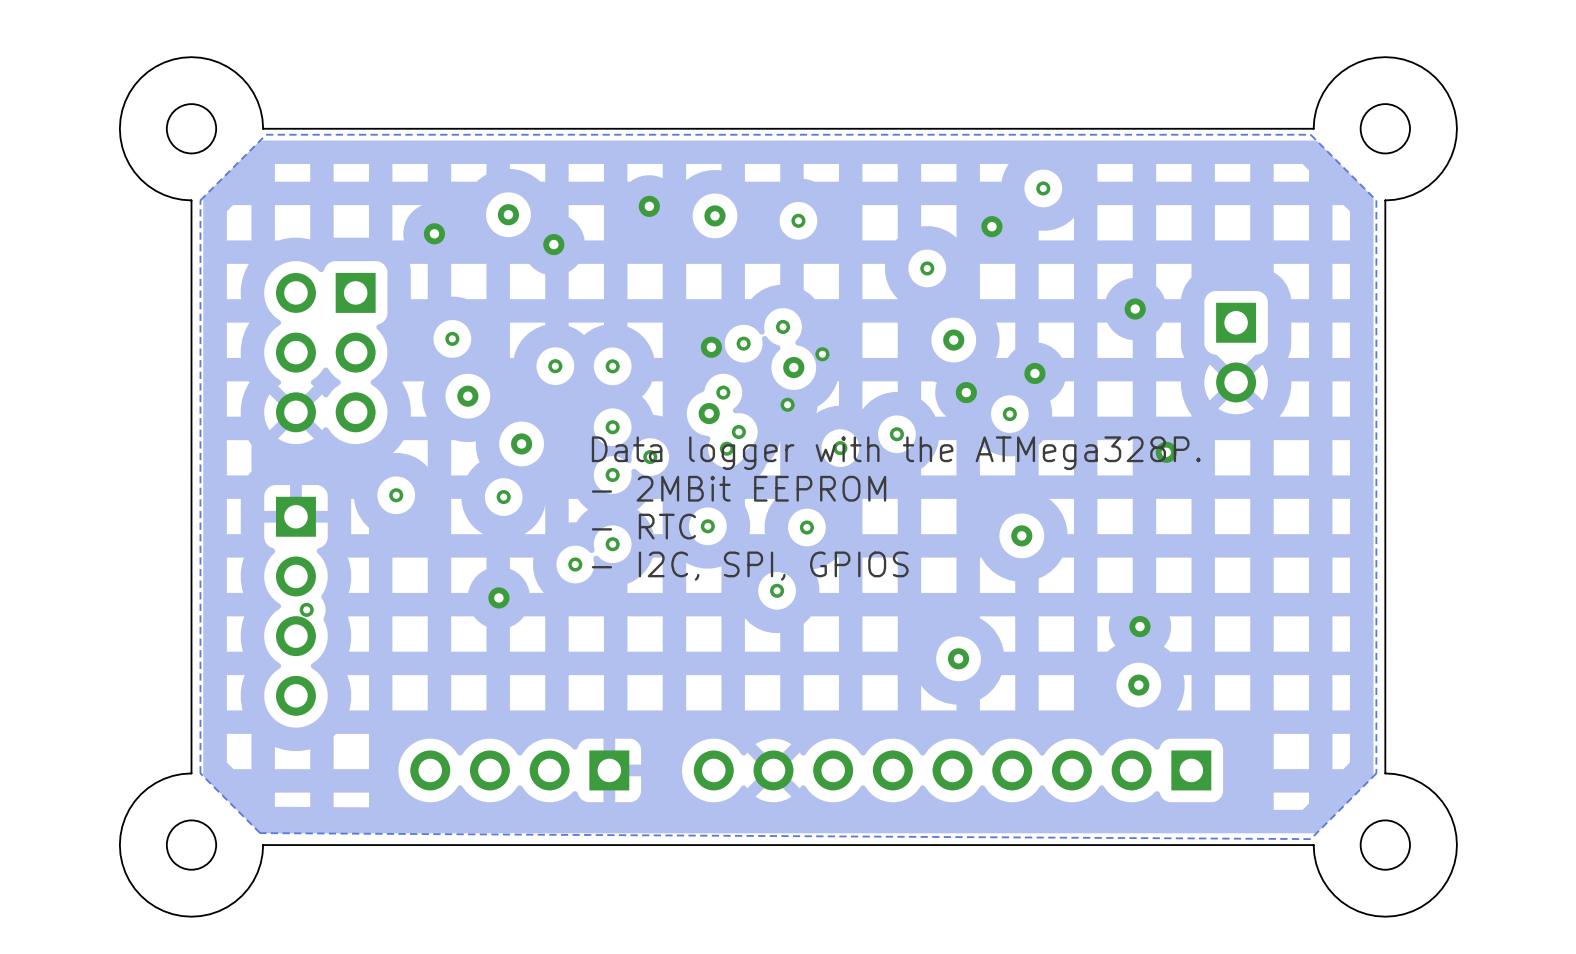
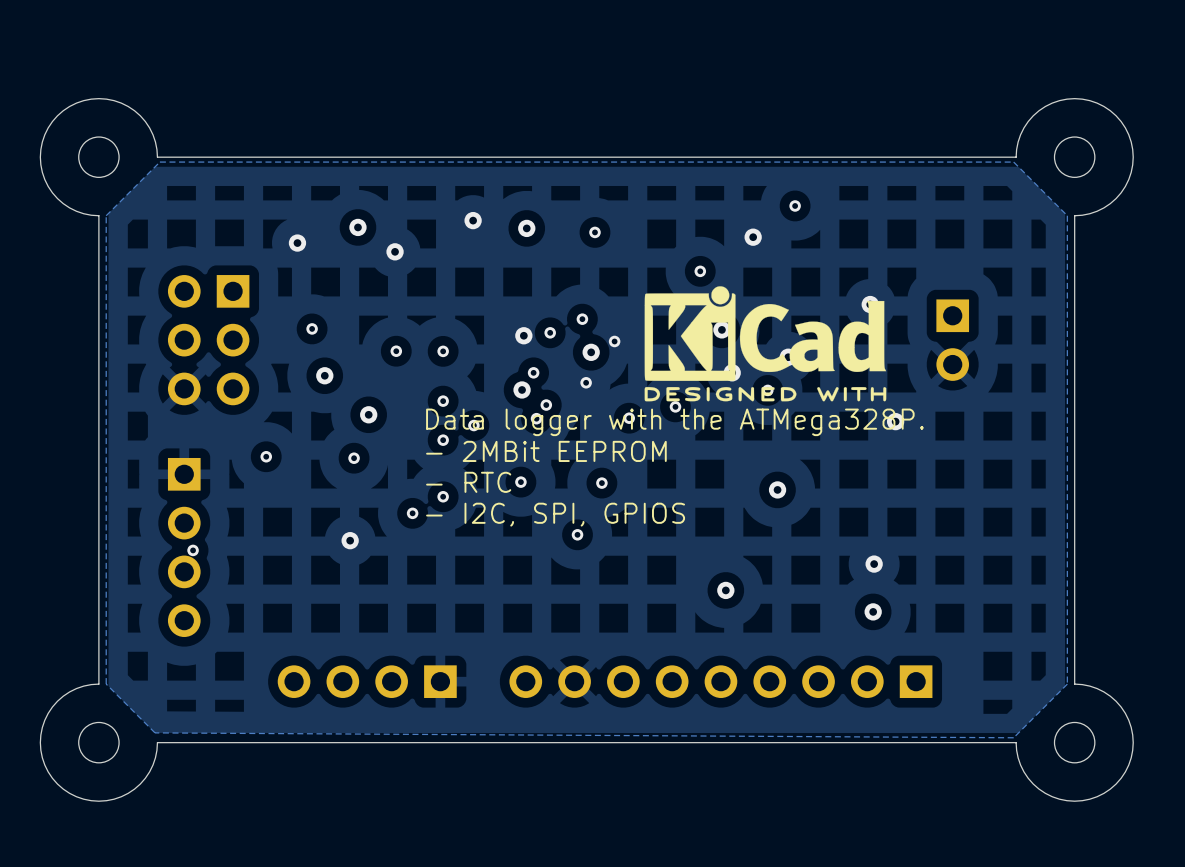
drawing: none -> [644, 286, 887, 402]

